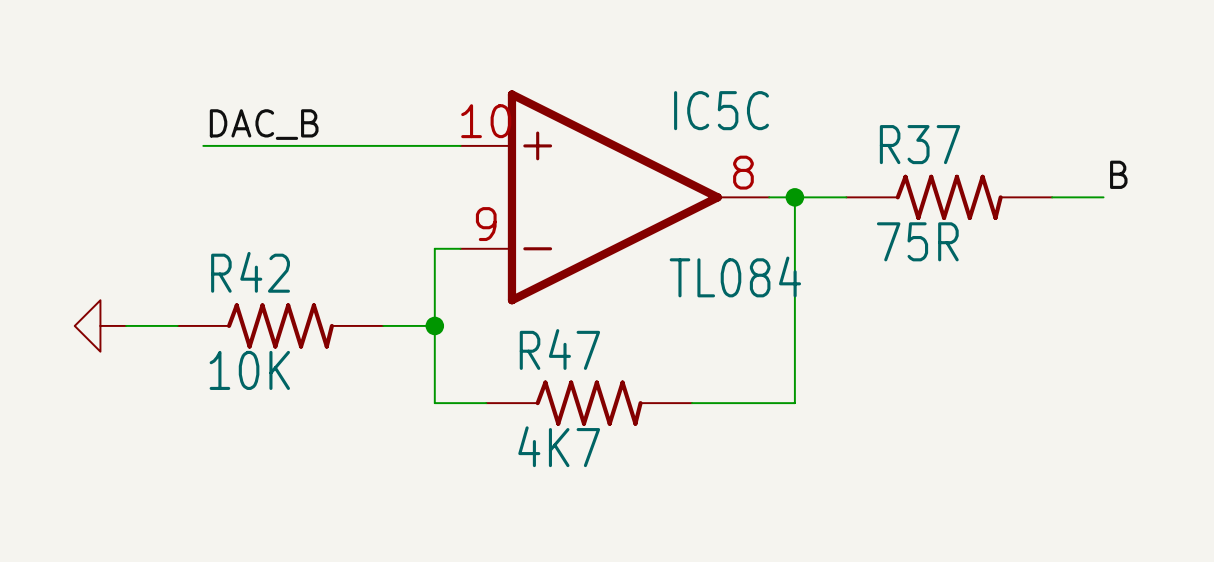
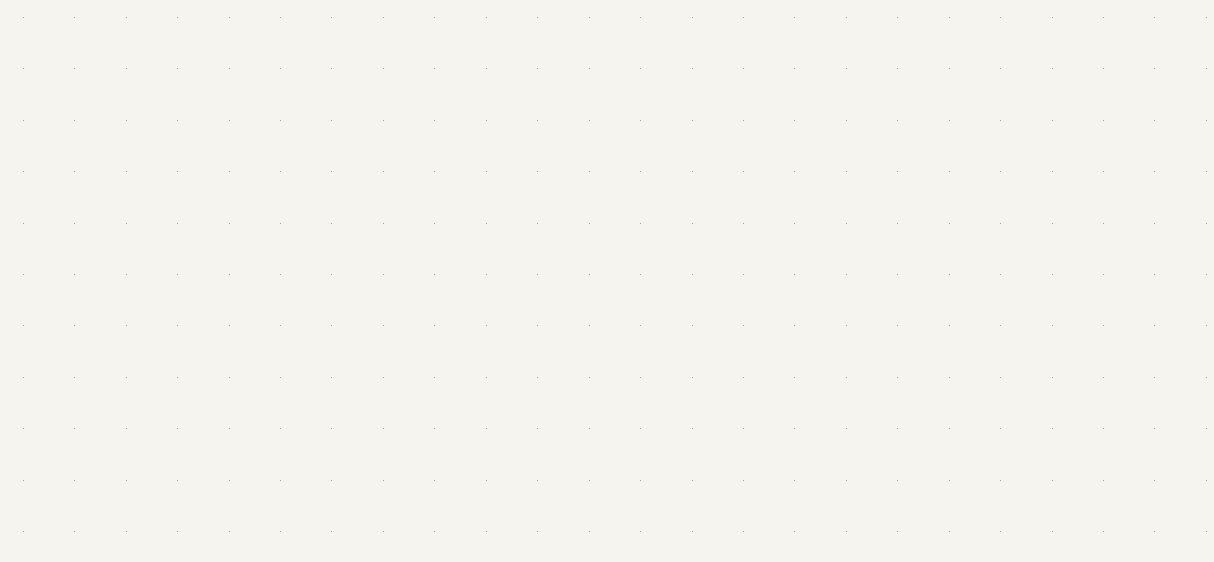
label: DAC_B (264, 124) -> none
wire: (203, 145) (460, 145) -> none
label: B (1118, 174) -> none
IC5C: TL084 (614, 197) -> none
wire: (769, 197) (846, 197) -> none
wire: (794, 197) (794, 403) (692, 403) -> none
junction: (794, 197) -> none
R37: 75R (949, 197) -> none
wire: (1052, 197) (1103, 197) -> none
wire: (460, 248) (434, 248) (434, 403) (486, 403) -> none
power symbol: (100, 325) -> none
wire: (126, 325) (177, 325) -> none
R42: 10K (280, 325) -> none
wire: (383, 325) (434, 325) -> none
junction: (434, 325) -> none
R47: 4K7 (589, 403) -> none

